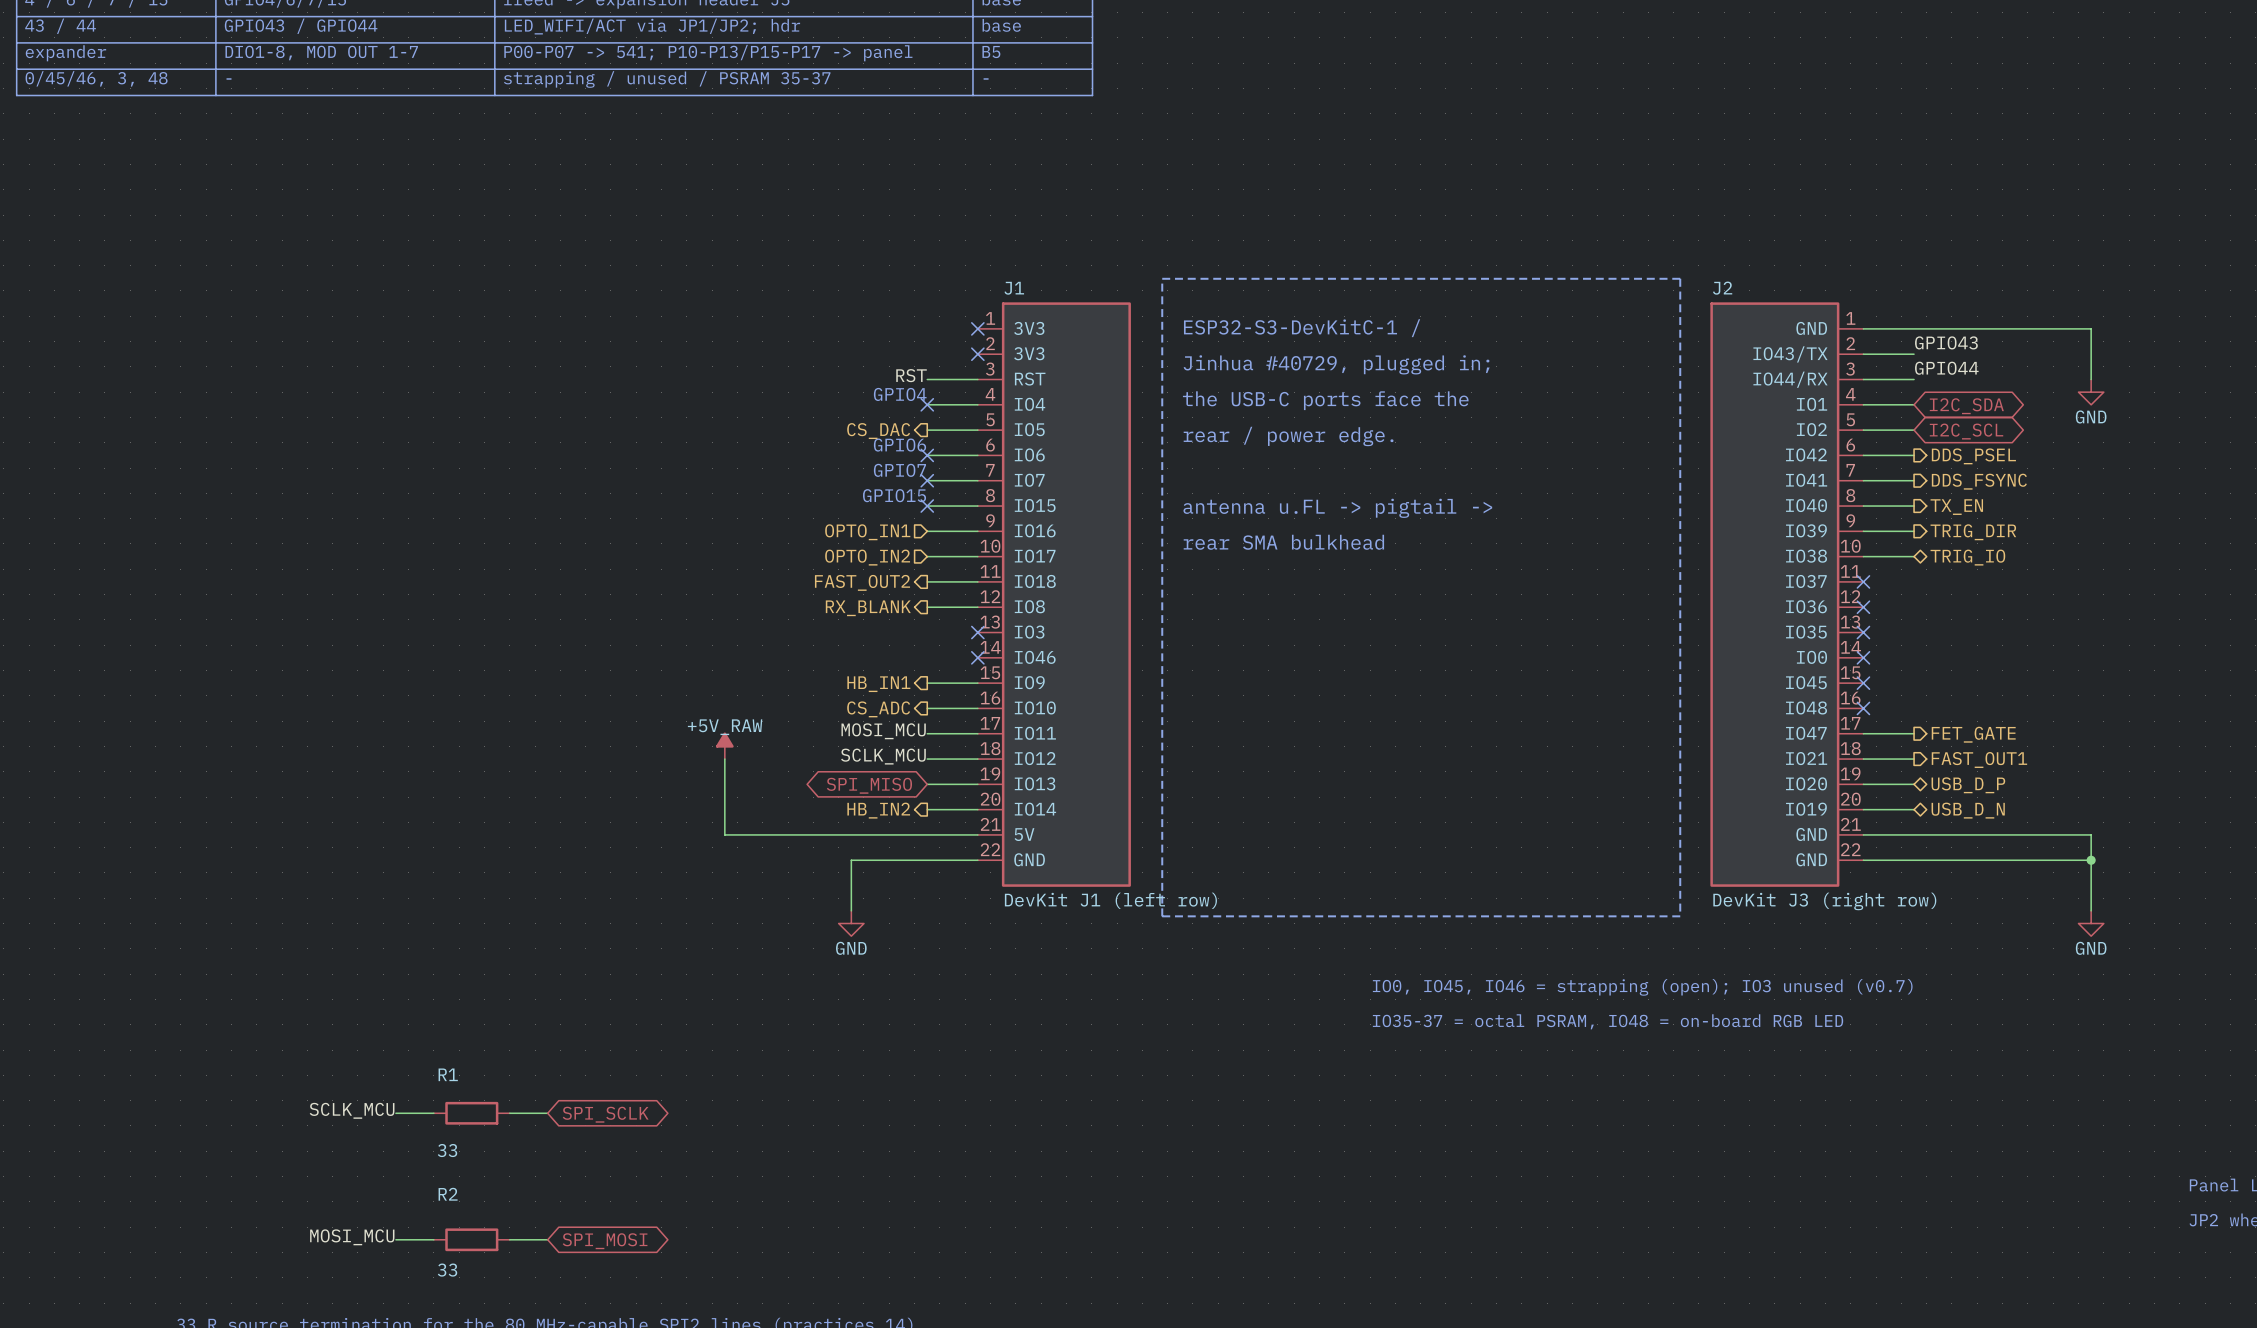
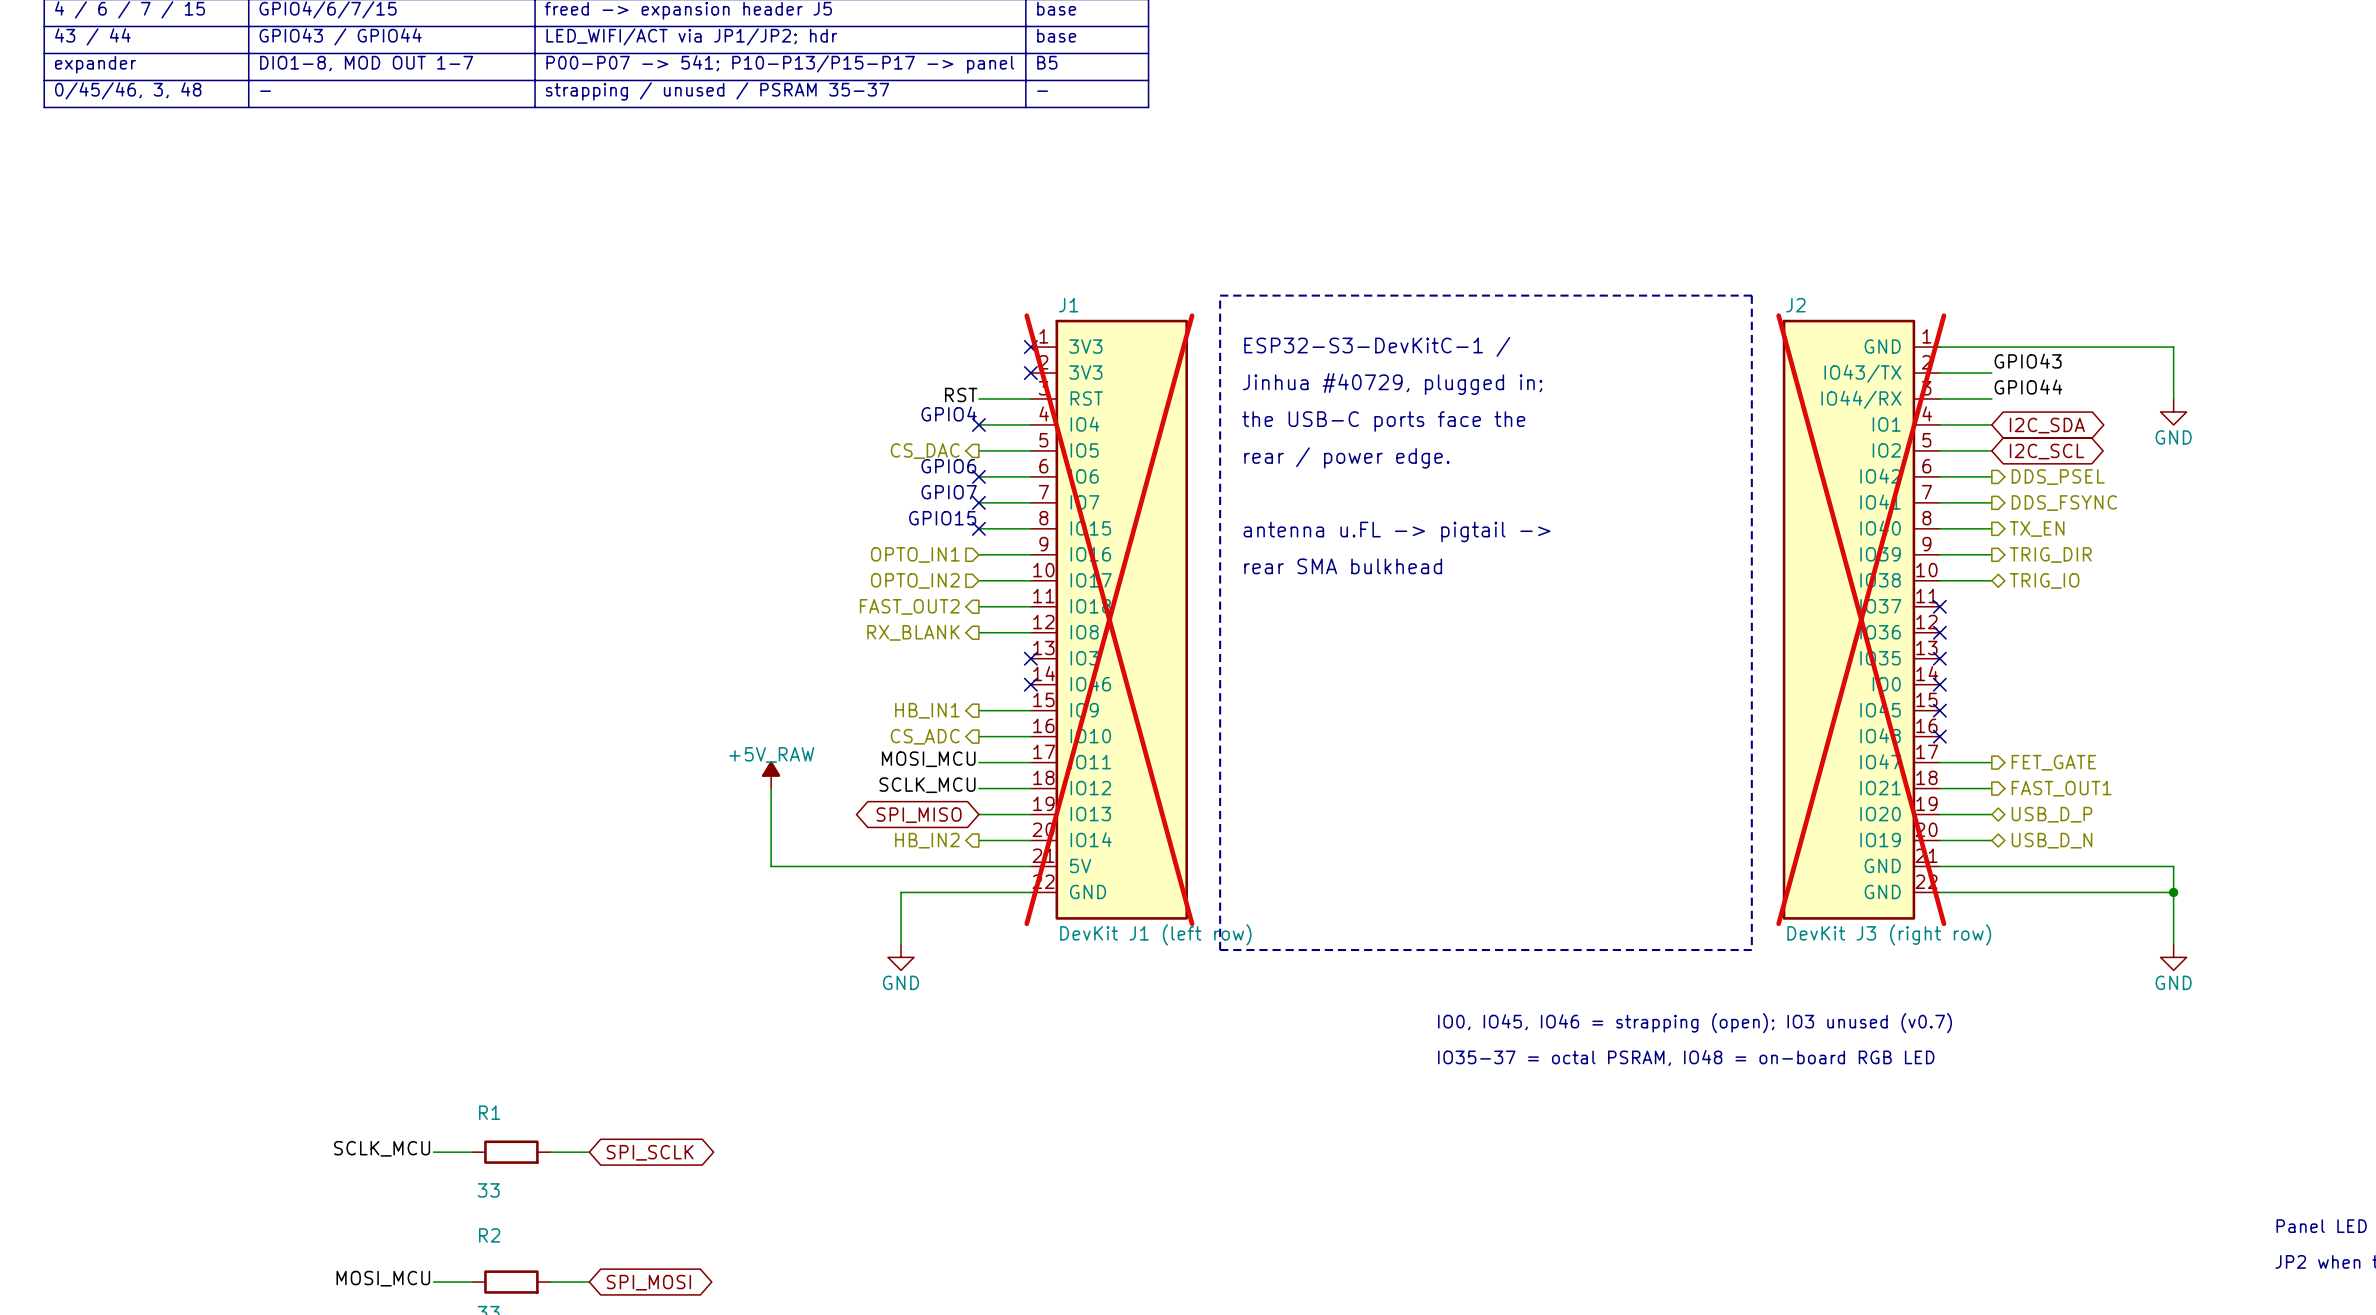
J1 do-not-place cross: none -> (1109, 619)
J2 do-not-place cross: none -> (1861, 619)

